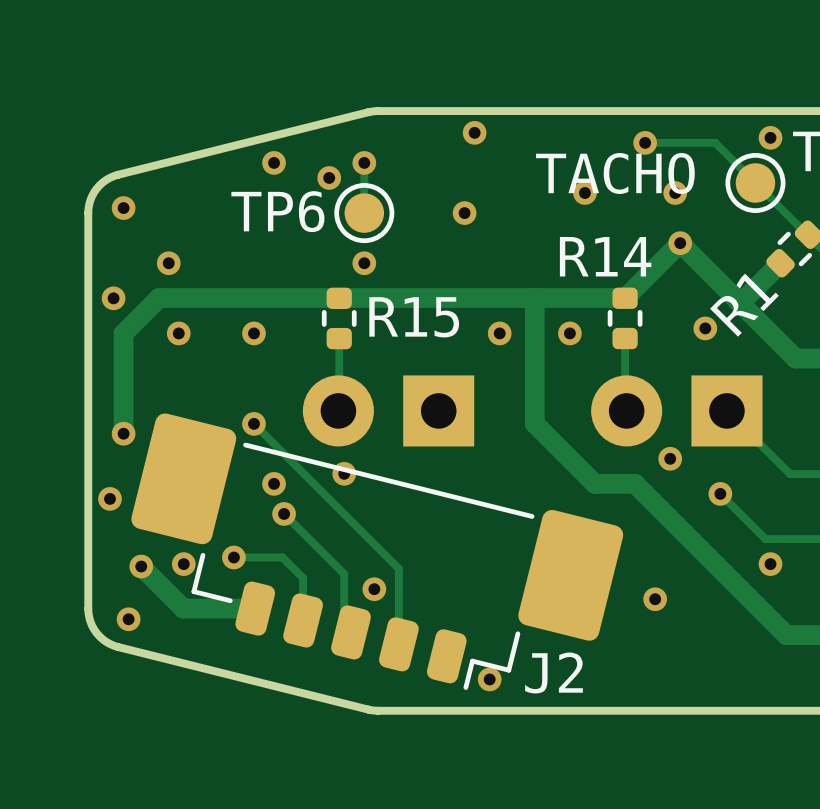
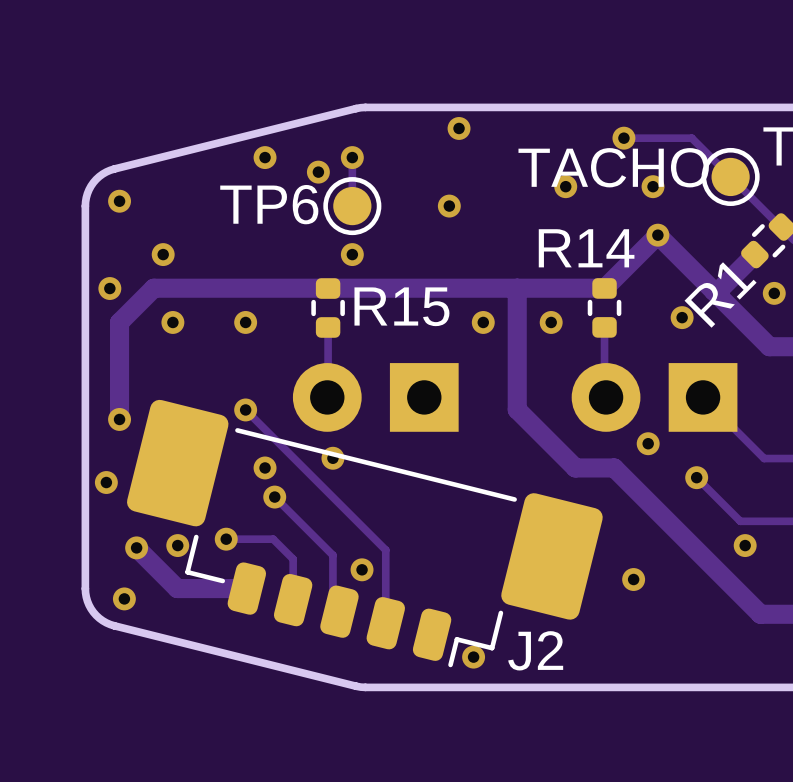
via: (770, 137) -> none
via: none -> (774, 293)

